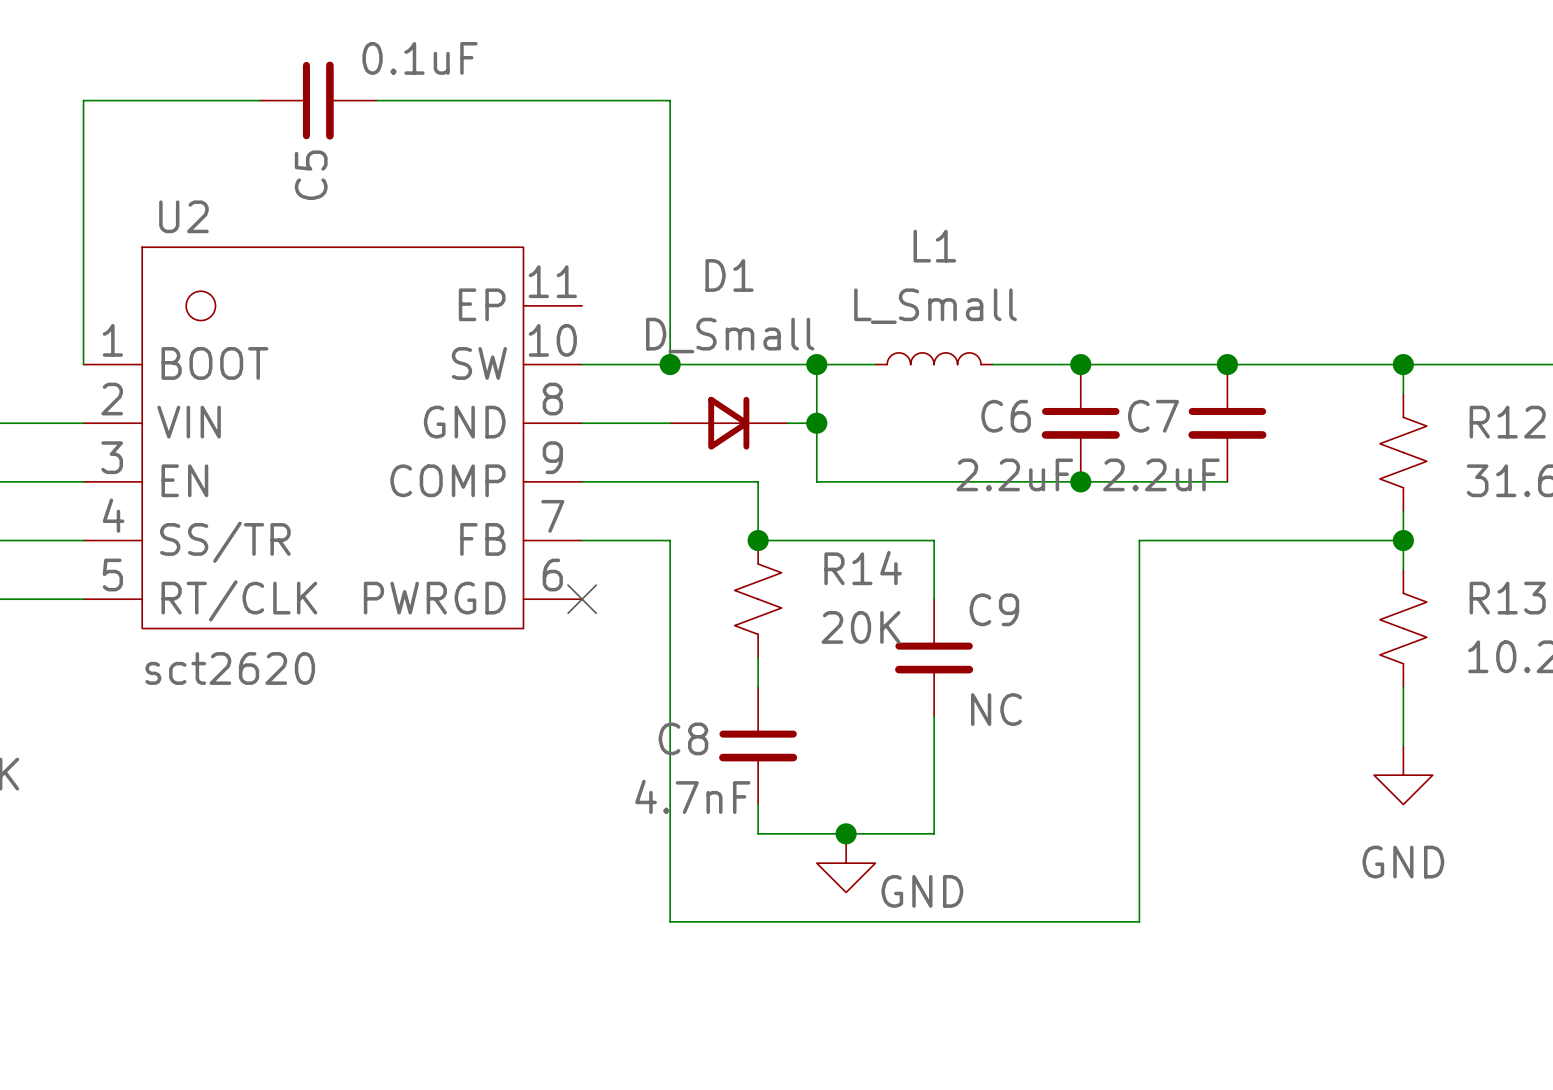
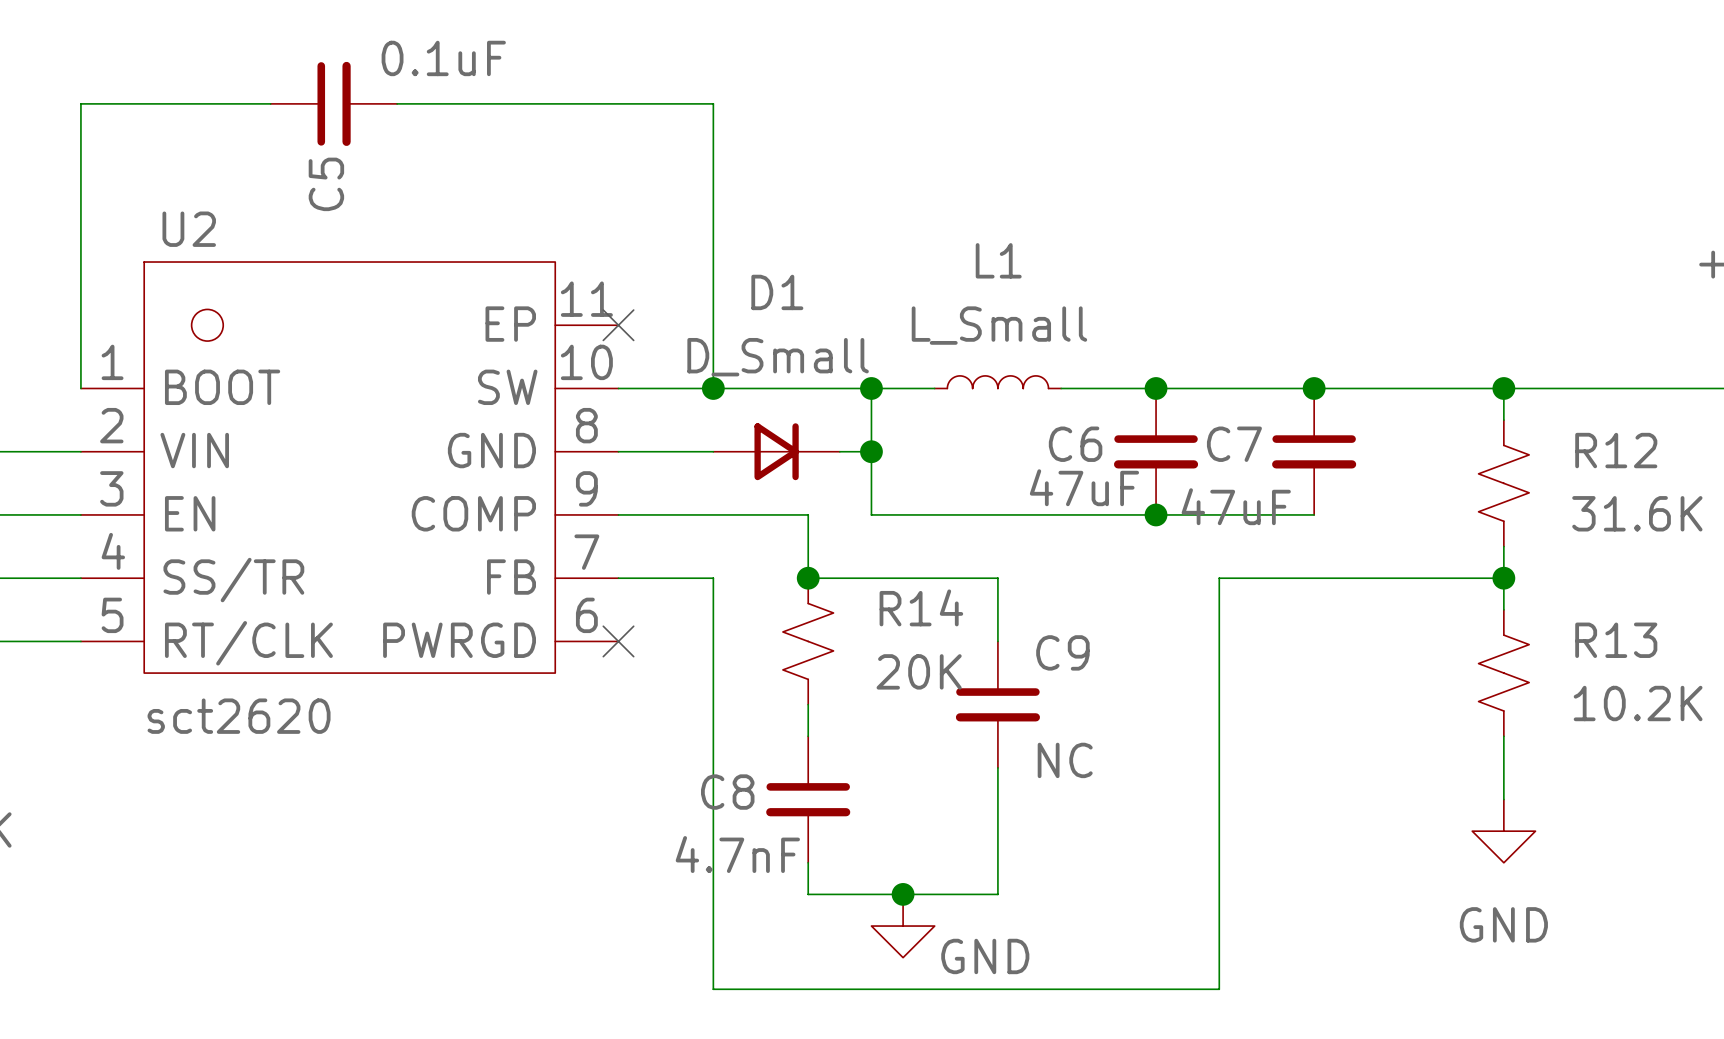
no-connect mark: none -> (618, 325)
C6 value: 2.2uF (1014, 474) -> 47uF (1084, 487)
C7 value: 2.2uF (1161, 474) -> 47uF (1236, 506)

